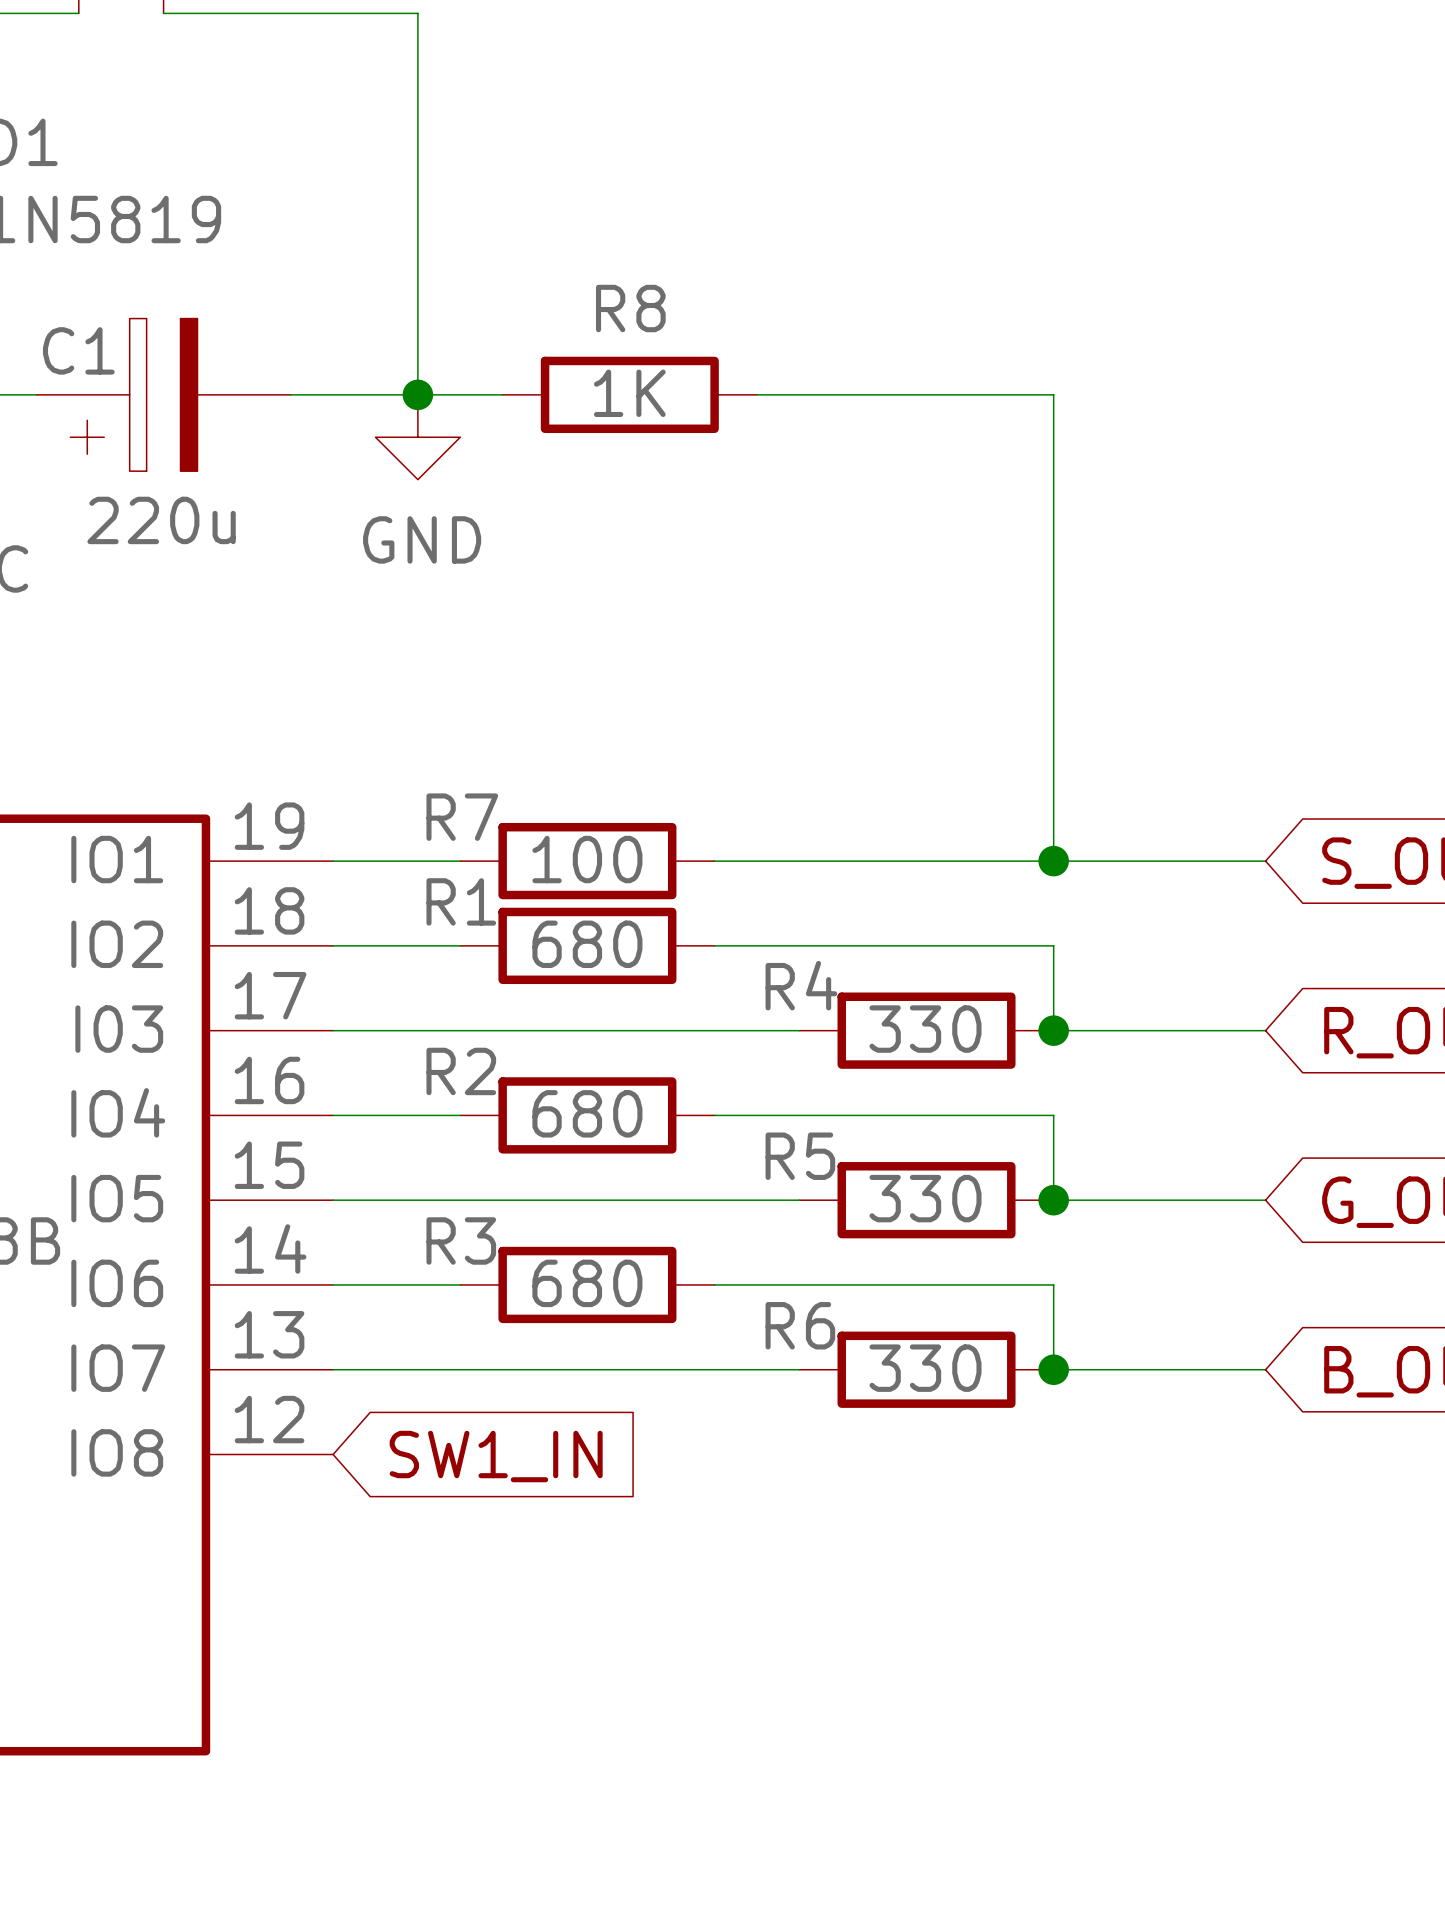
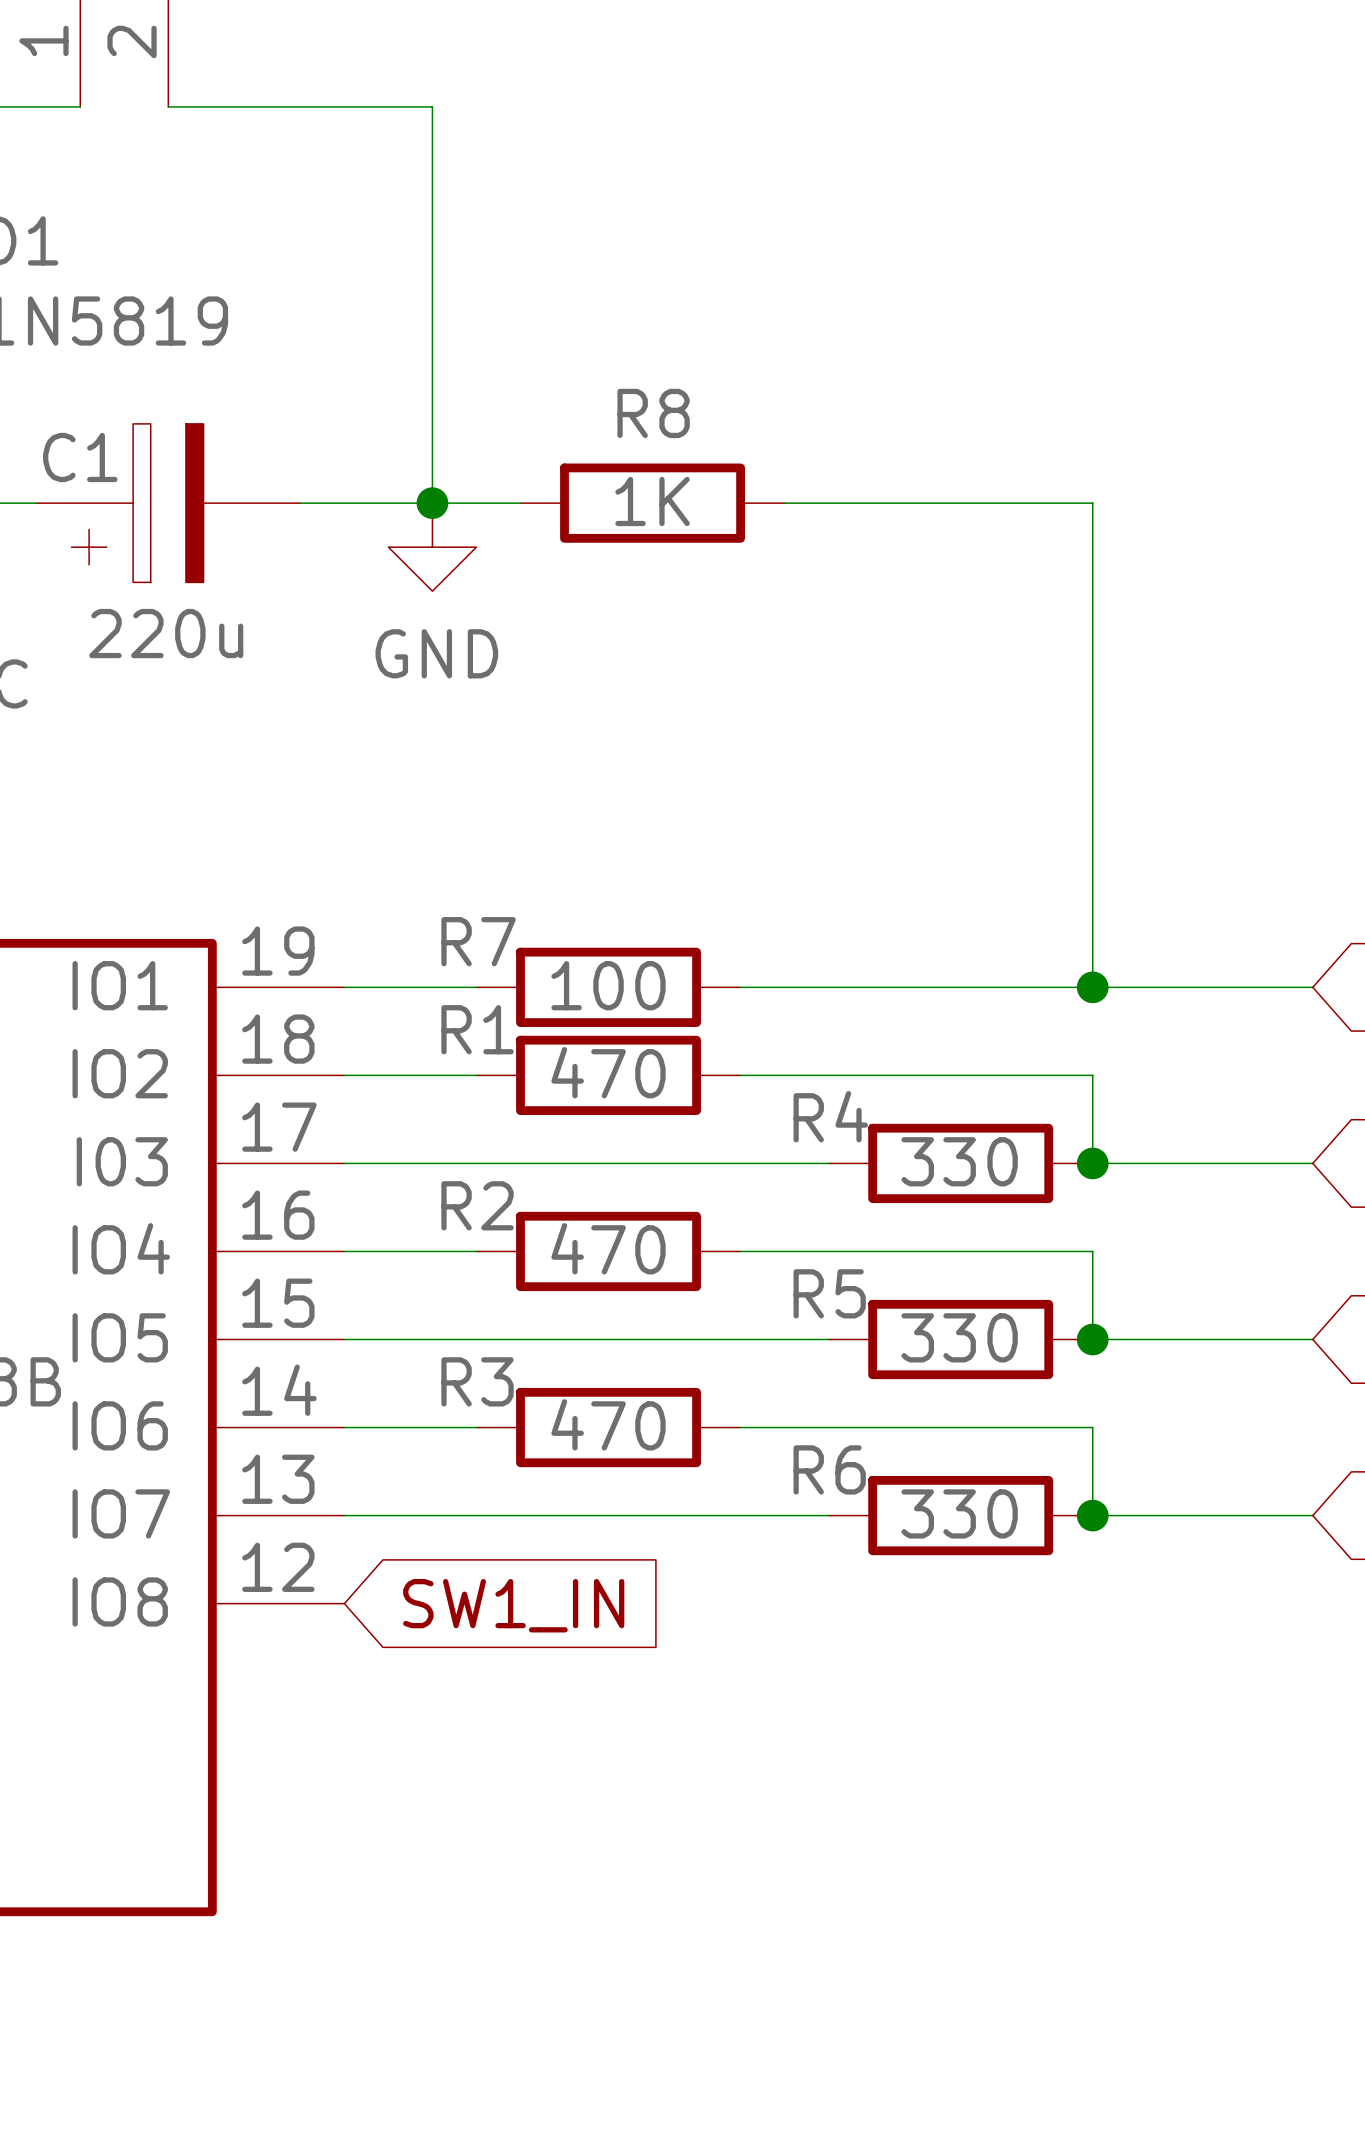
R1 value: 680 (587, 944) -> 470 (608, 1072)
R2 value: 680 (587, 1113) -> 470 (608, 1248)
R3 value: 680 (587, 1283) -> 470 (608, 1424)

